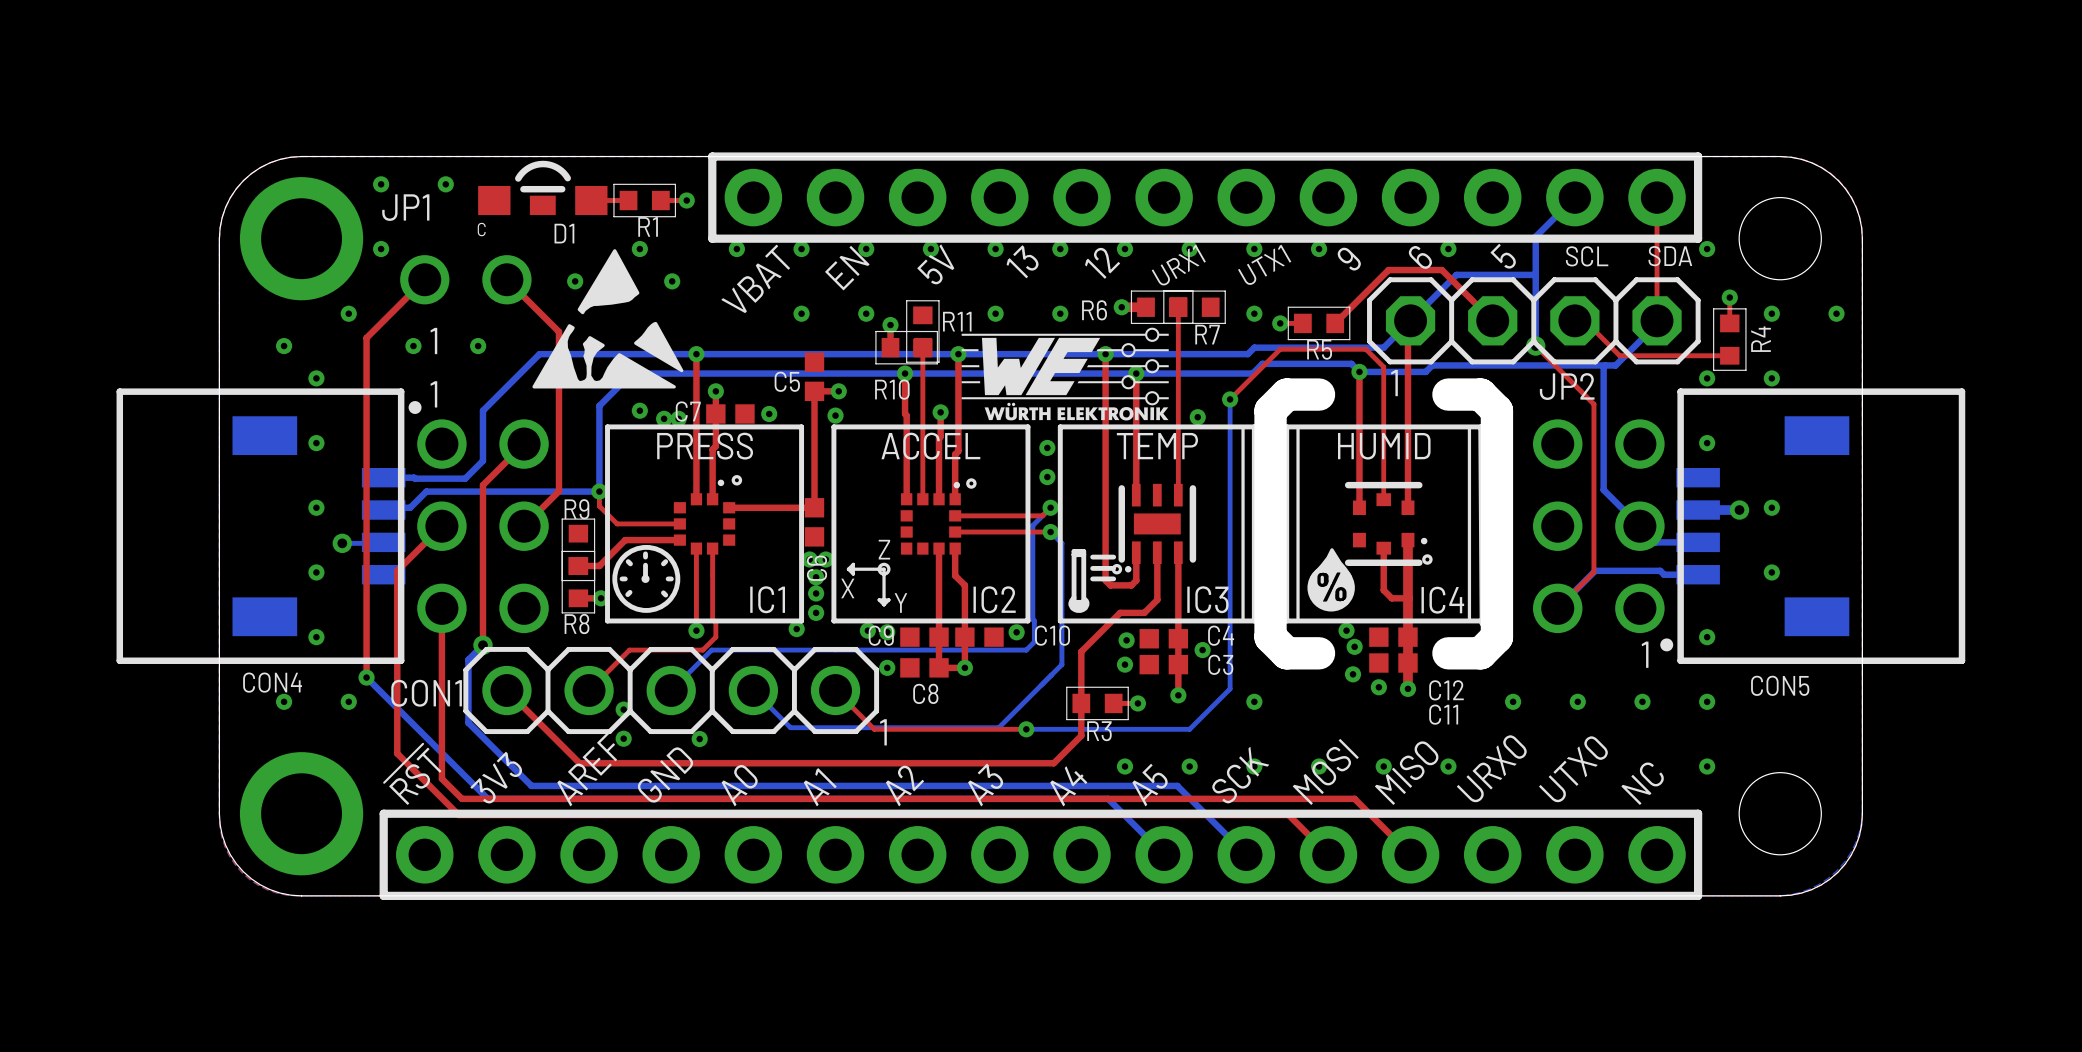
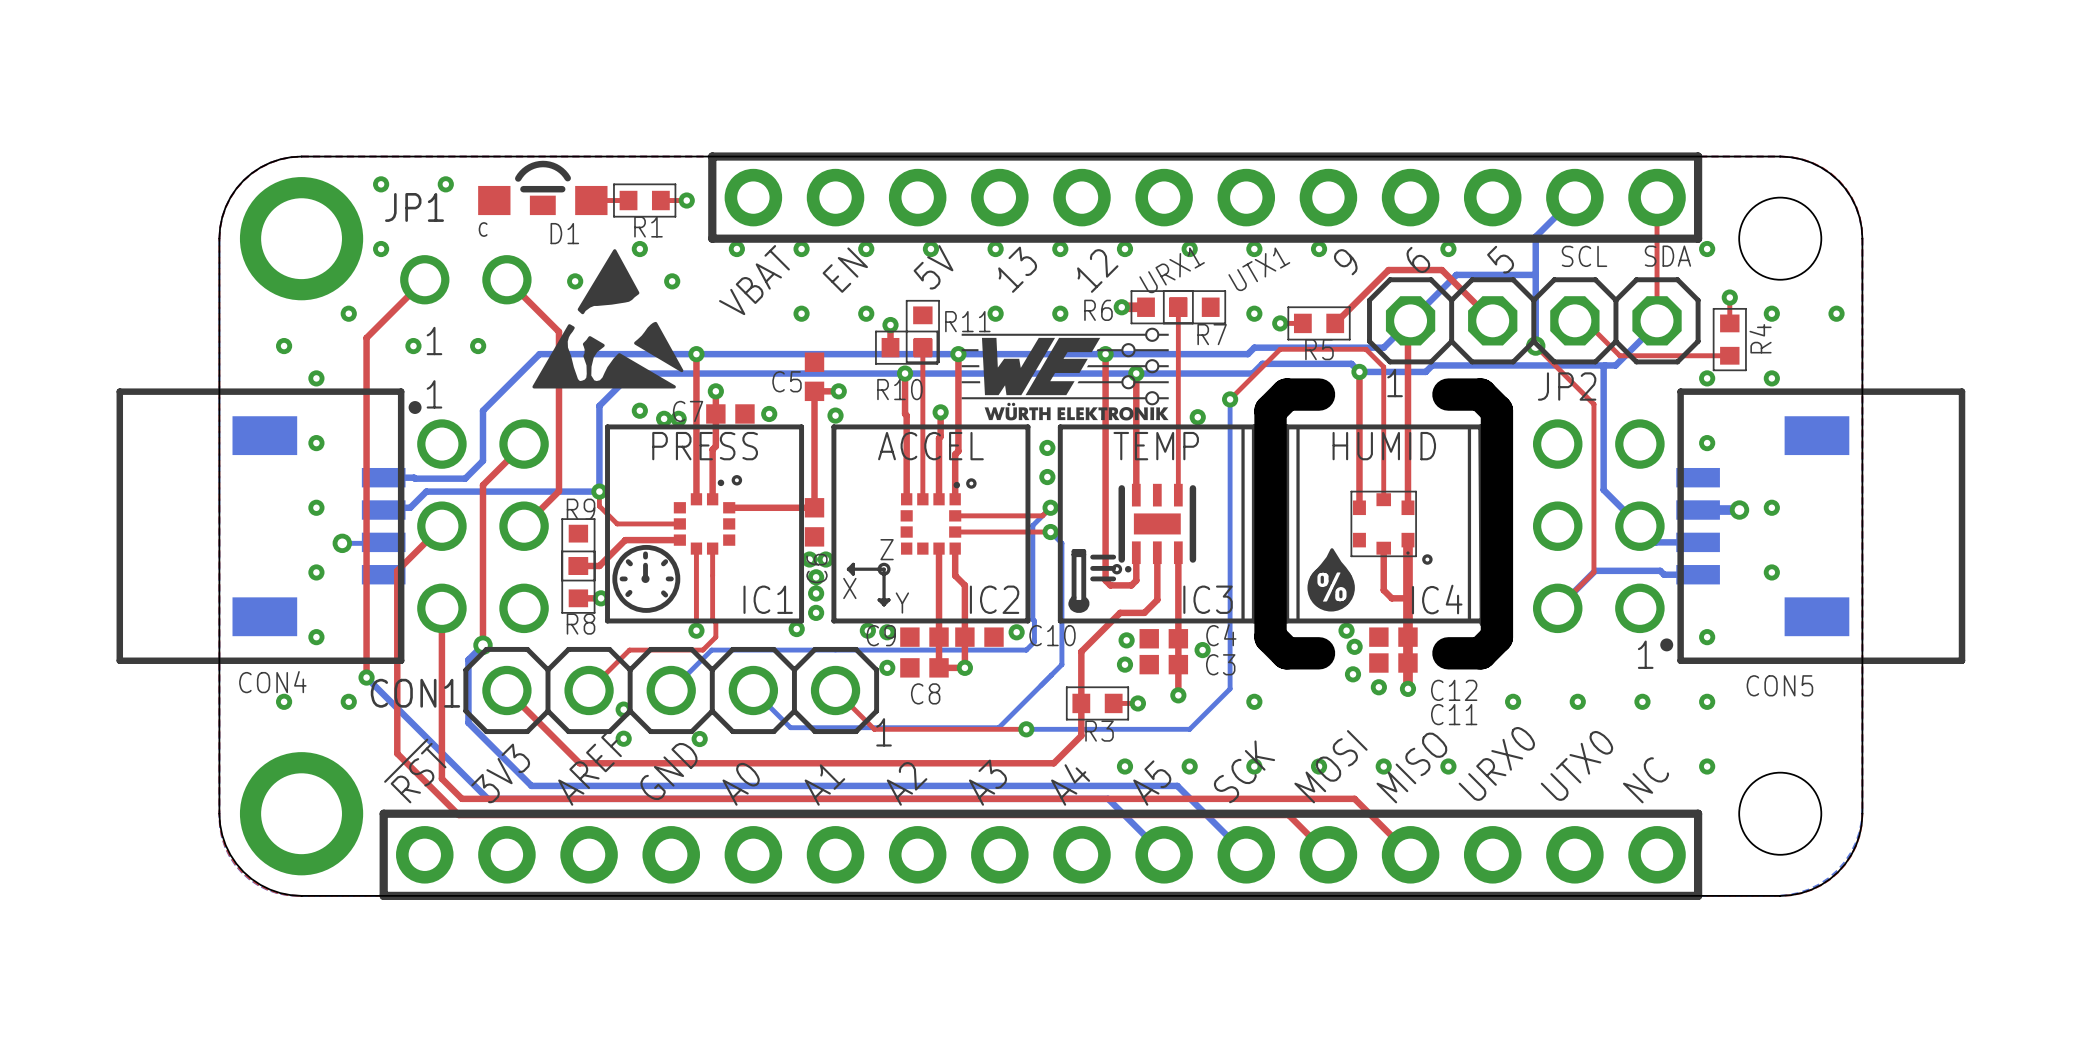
IC4 footprint: [1344, 481, 1428, 566] -> [1350, 490, 1417, 558]

